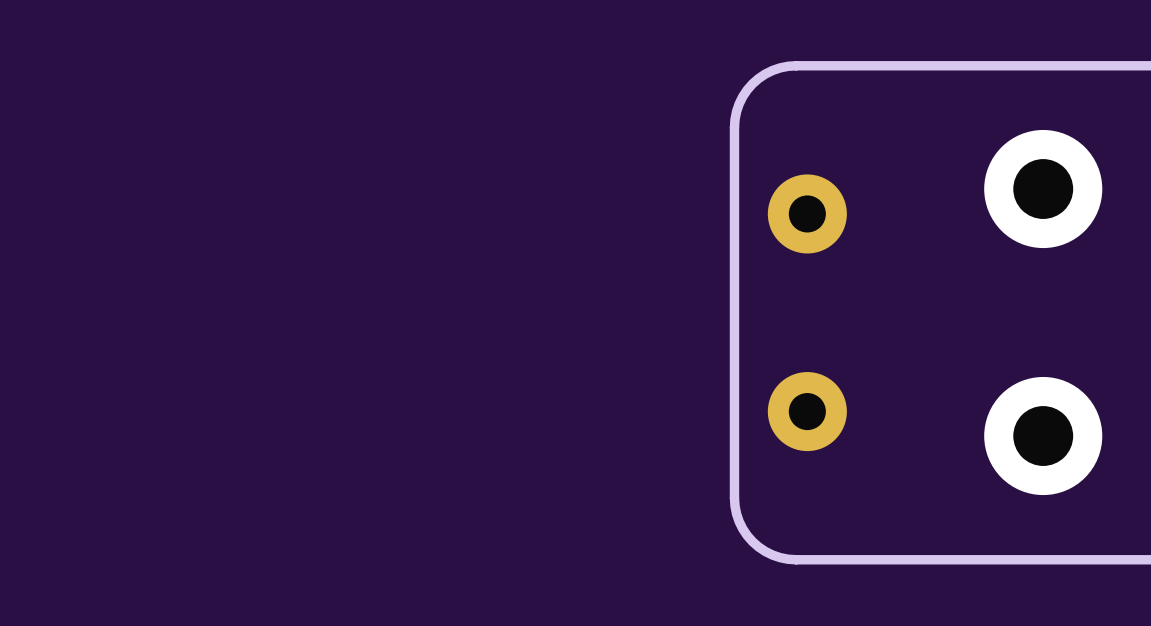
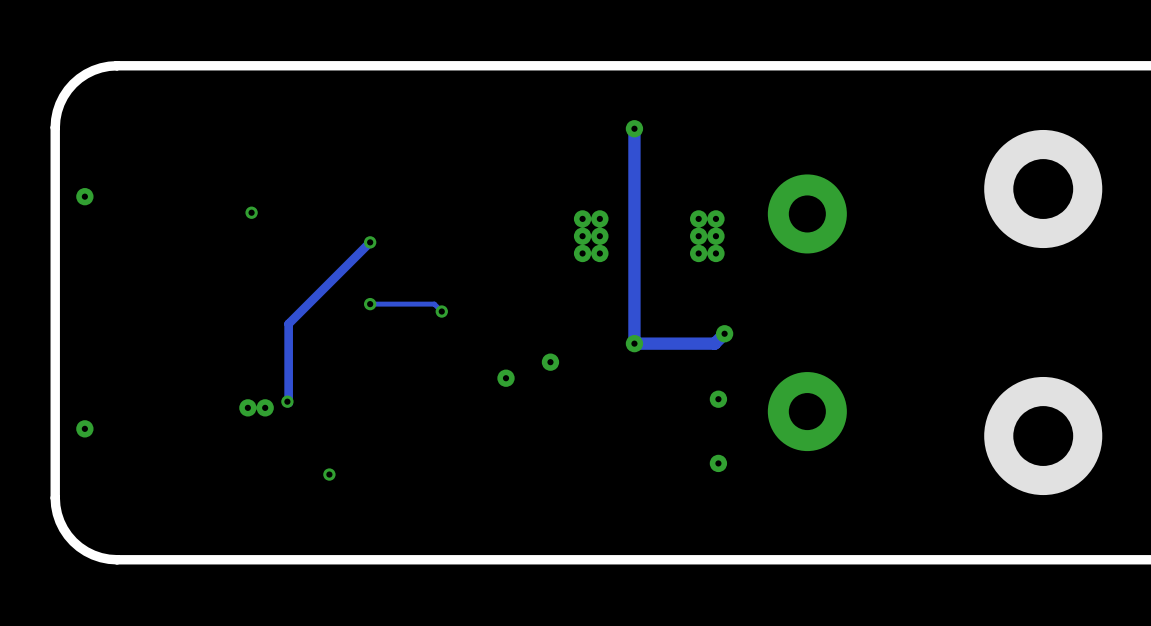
board edge: (796, 65) (772, 70) (752, 83) (739, 103) (734, 127) (735, 506) (742, 528) (758, 547) (772, 555) (796, 559) -> (796, 65) (108, 66) (86, 74) (67, 89) (57, 111) (55, 127) (55, 506) (63, 528) (73, 541) (86, 551) (101, 557) (116, 559) (796, 559)
track: none -> (634, 128) (634, 343) (714, 343) (724, 333)
via: none -> (634, 128)
via: none -> (84, 196)
via: none -> (251, 212)
via: none -> (582, 218)
via: none -> (599, 218)
via: none -> (698, 218)
via: none -> (715, 218)
via: none -> (582, 236)
via: none -> (599, 236)
via: none -> (698, 236)
via: none -> (715, 236)
track: none -> (370, 242) (288, 323) (288, 402) (287, 401)
via: none -> (370, 242)
via: none -> (582, 253)
via: none -> (599, 253)
via: none -> (698, 253)
via: none -> (715, 253)
track: none -> (370, 304) (434, 304) (441, 311)
via: none -> (370, 304)
via: none -> (441, 311)
via: none -> (724, 333)
via: none -> (634, 343)
via: none -> (550, 362)
via: none -> (506, 378)
via: none -> (718, 399)
via: none -> (287, 401)
via: none -> (247, 407)
via: none -> (265, 407)
via: none -> (84, 428)
via: none -> (718, 463)
via: none -> (329, 474)

